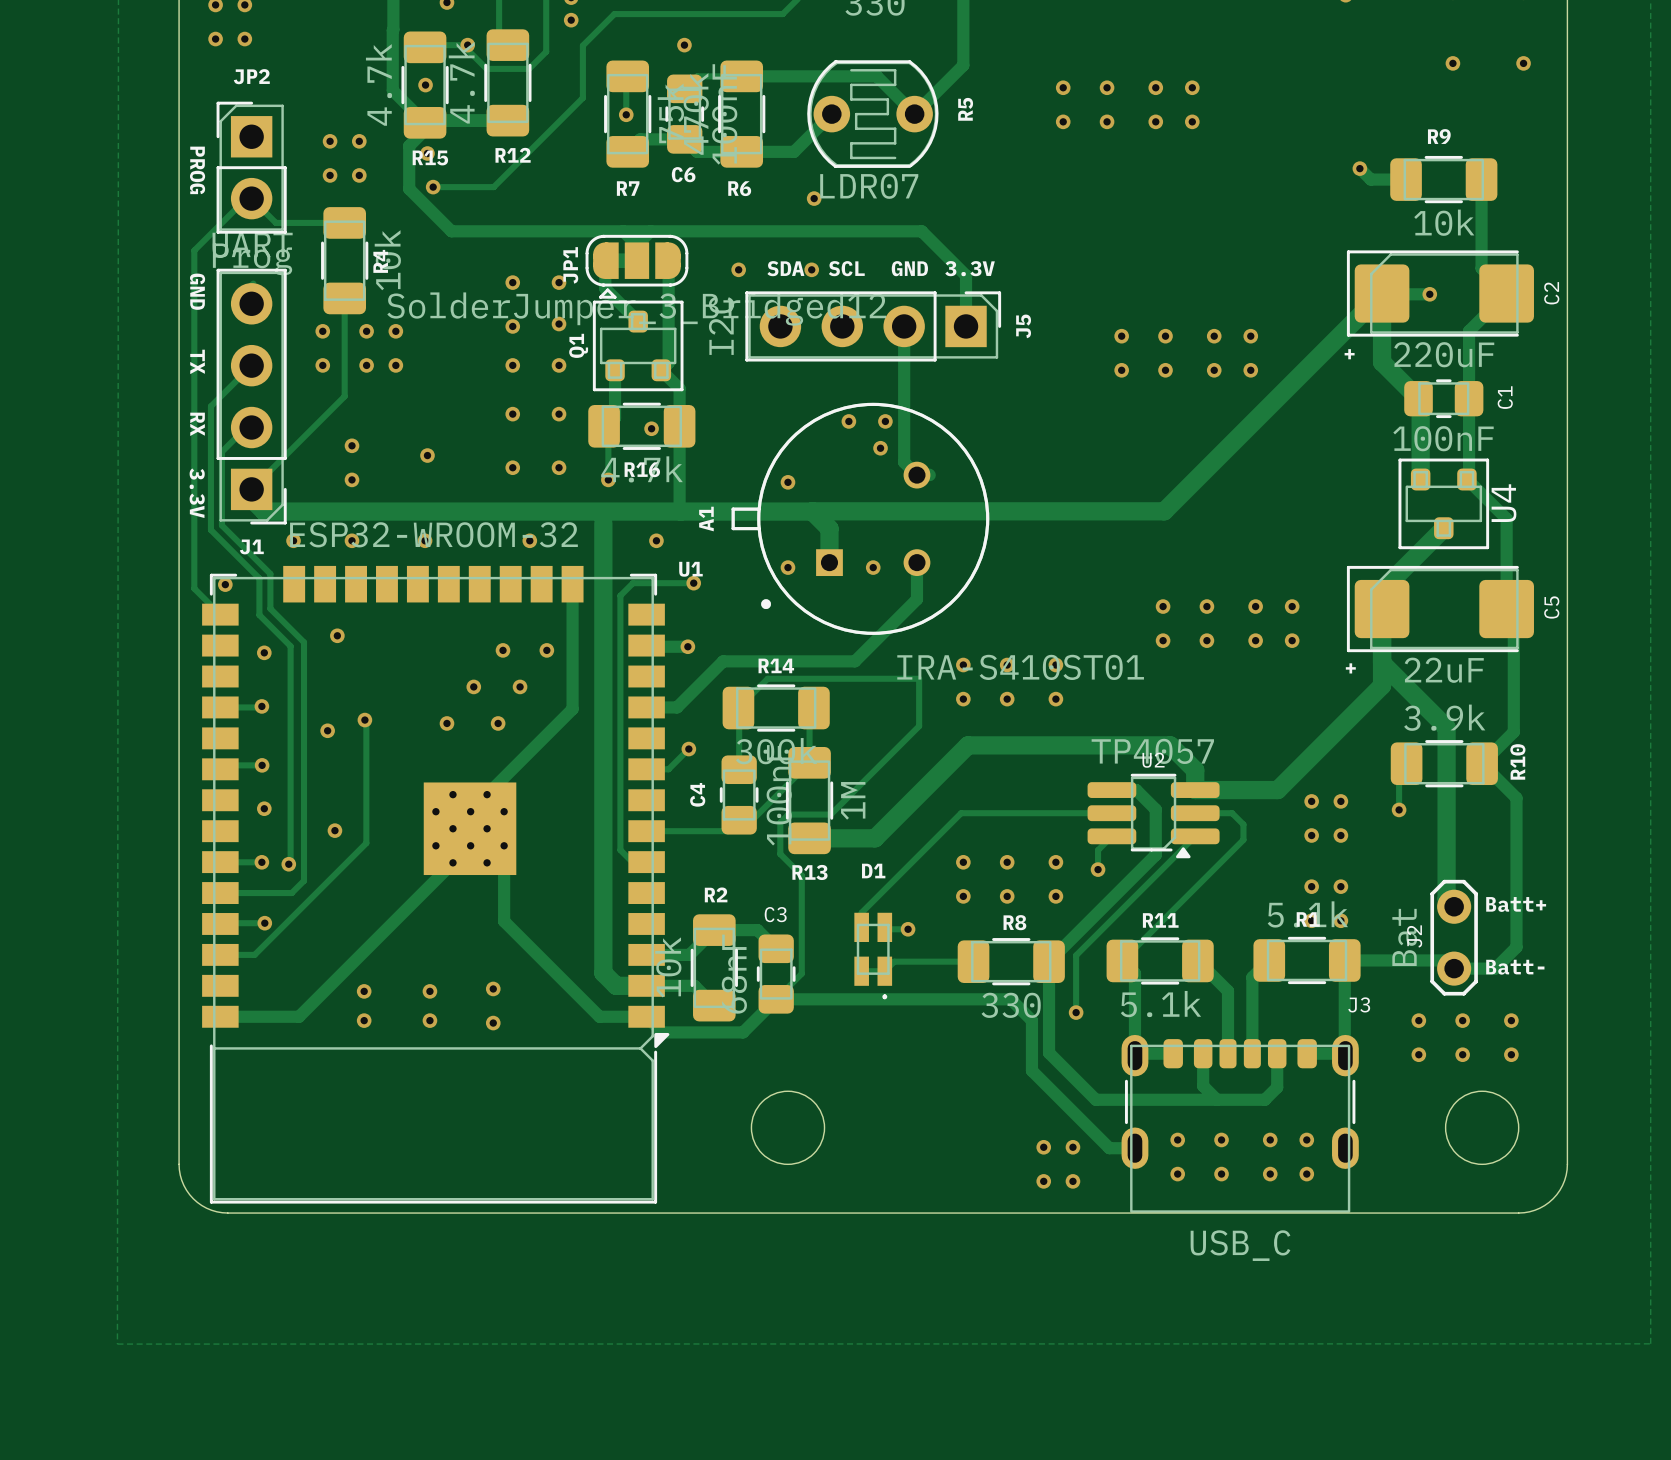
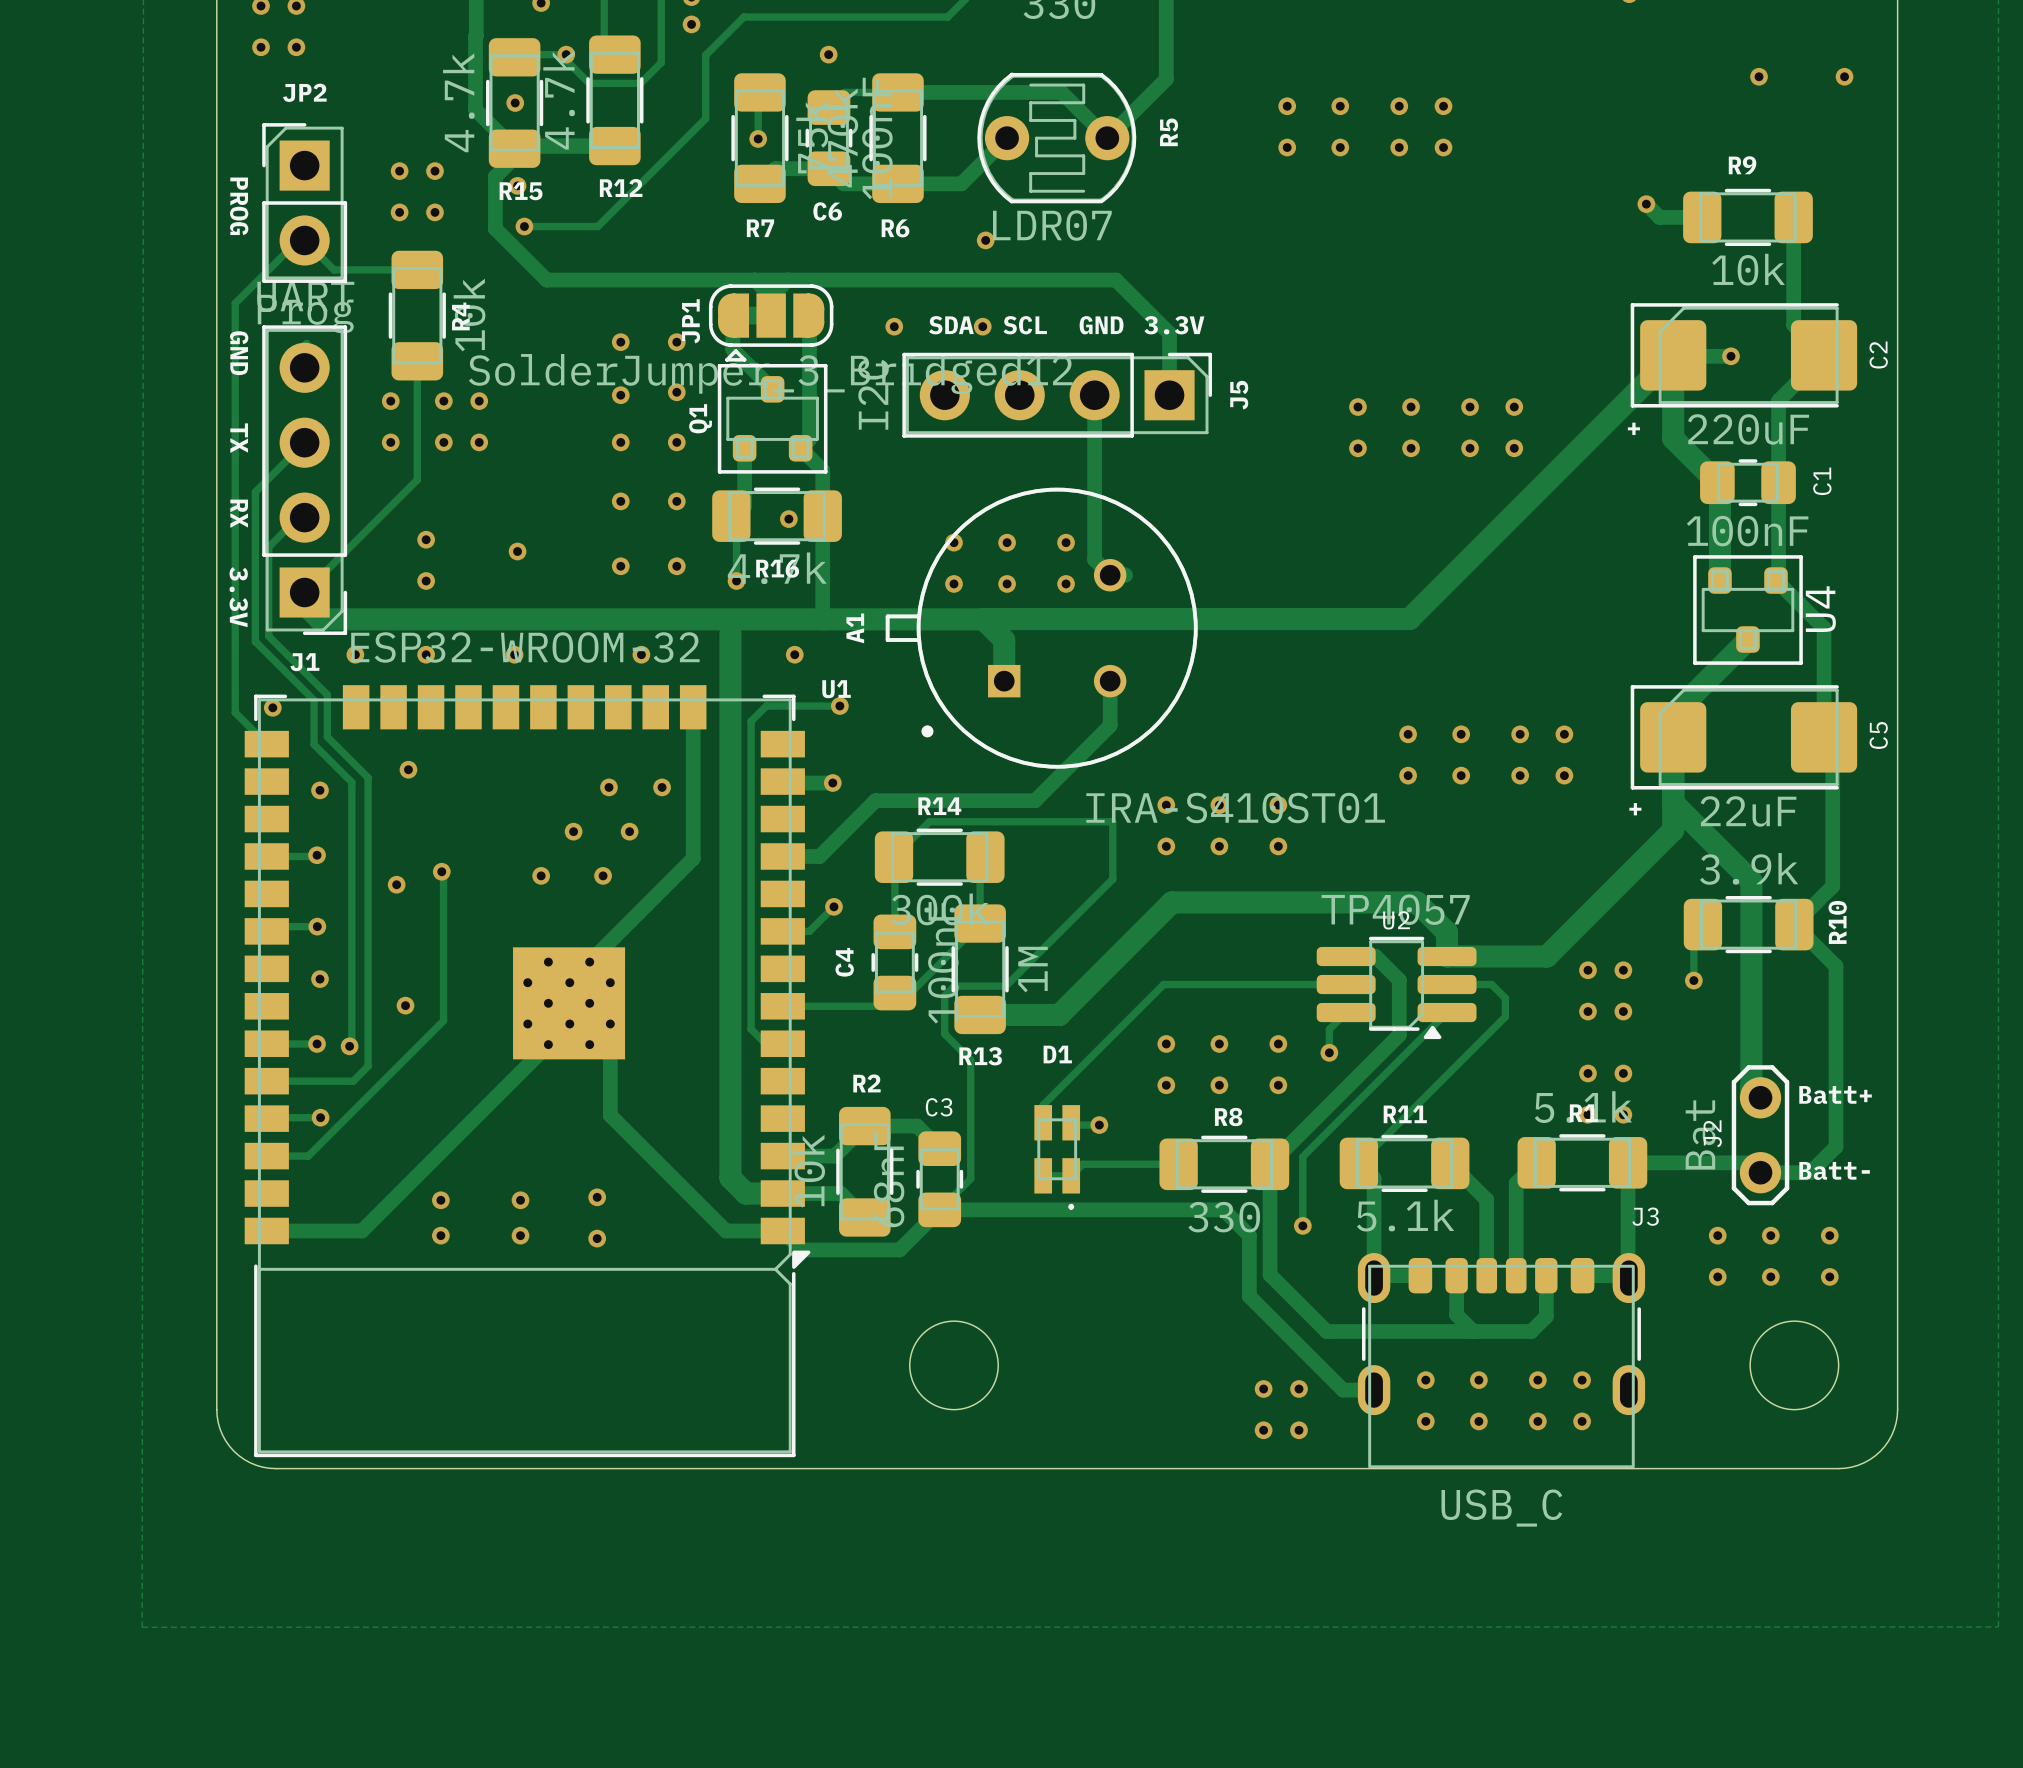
via: (848, 421) -> none
via: (885, 421) -> none
via: none -> (953, 542)
via: none -> (1007, 542)
via: none -> (1007, 583)
via: none -> (1066, 583)
via: (787, 567) -> none
via: (873, 567) -> none

